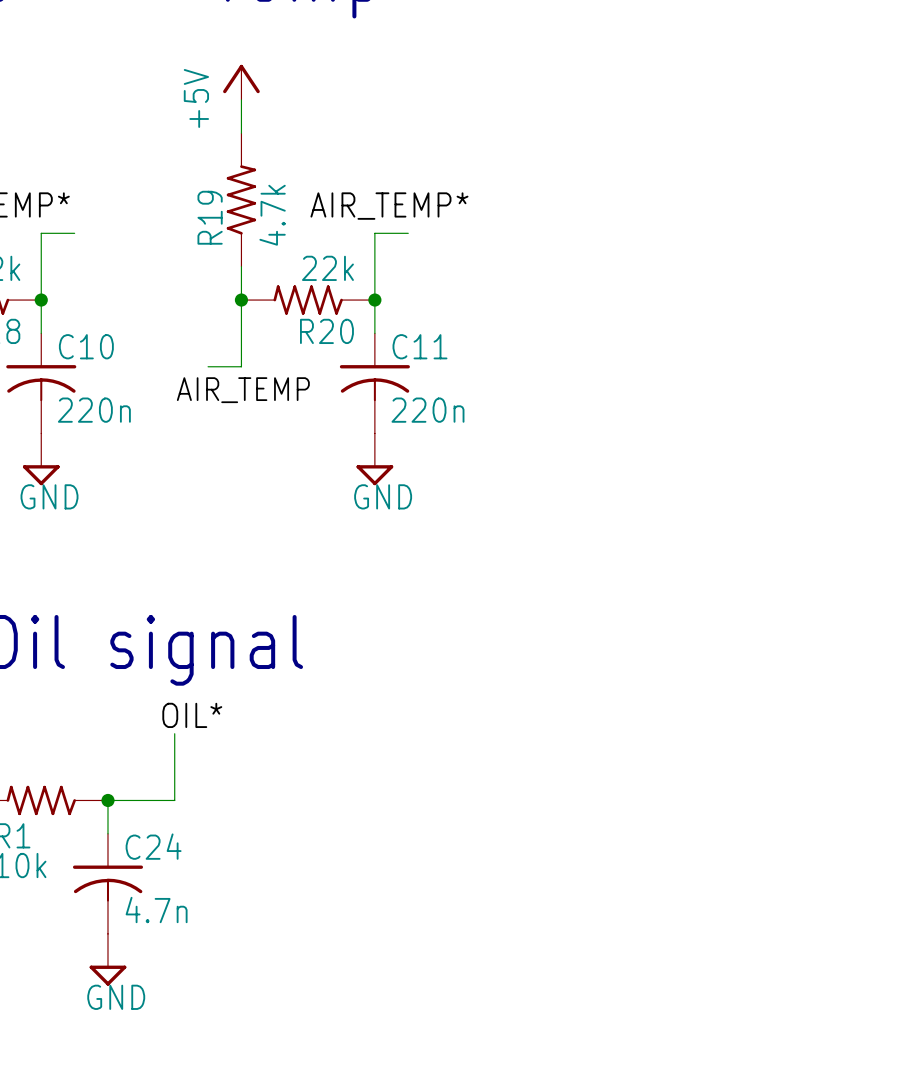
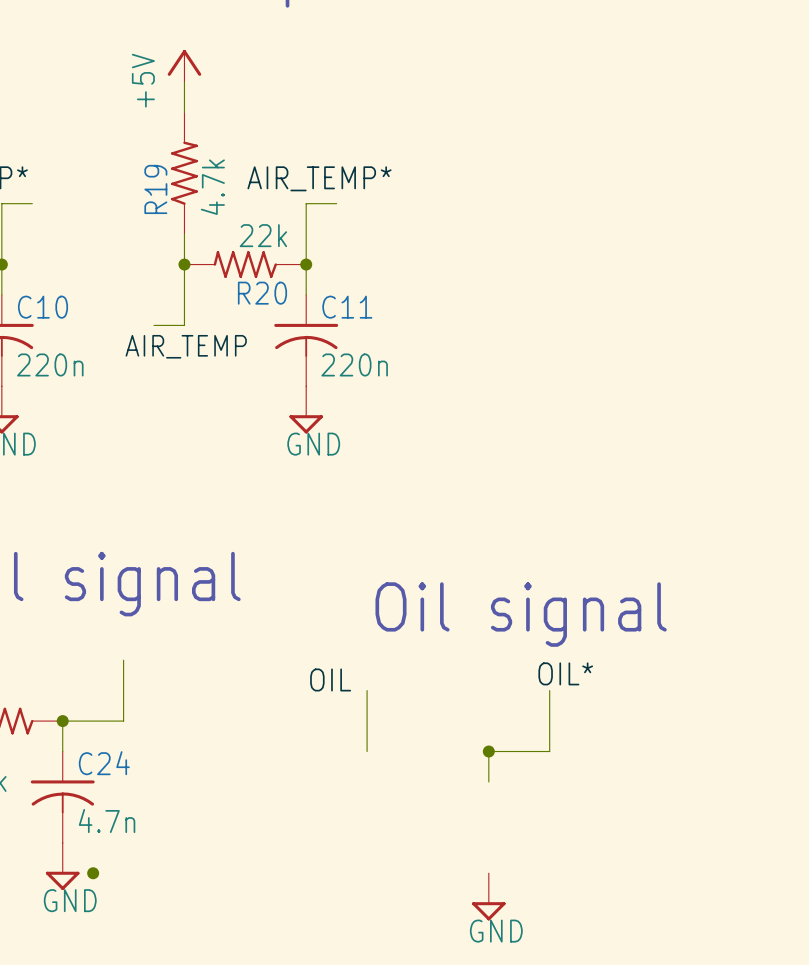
text: none -> Oil signal (521, 614)
label: OIL* (192, 715) -> none
label: none -> OIL* (565, 673)
label: none -> OIL (330, 679)
wire: none -> (367, 690) (367, 751)
wire: none -> (549, 690) (549, 751) (488, 751) (488, 781)
junction: none -> (488, 751)
junction: none -> (93, 873)
power symbol: none -> GND (488, 896)

